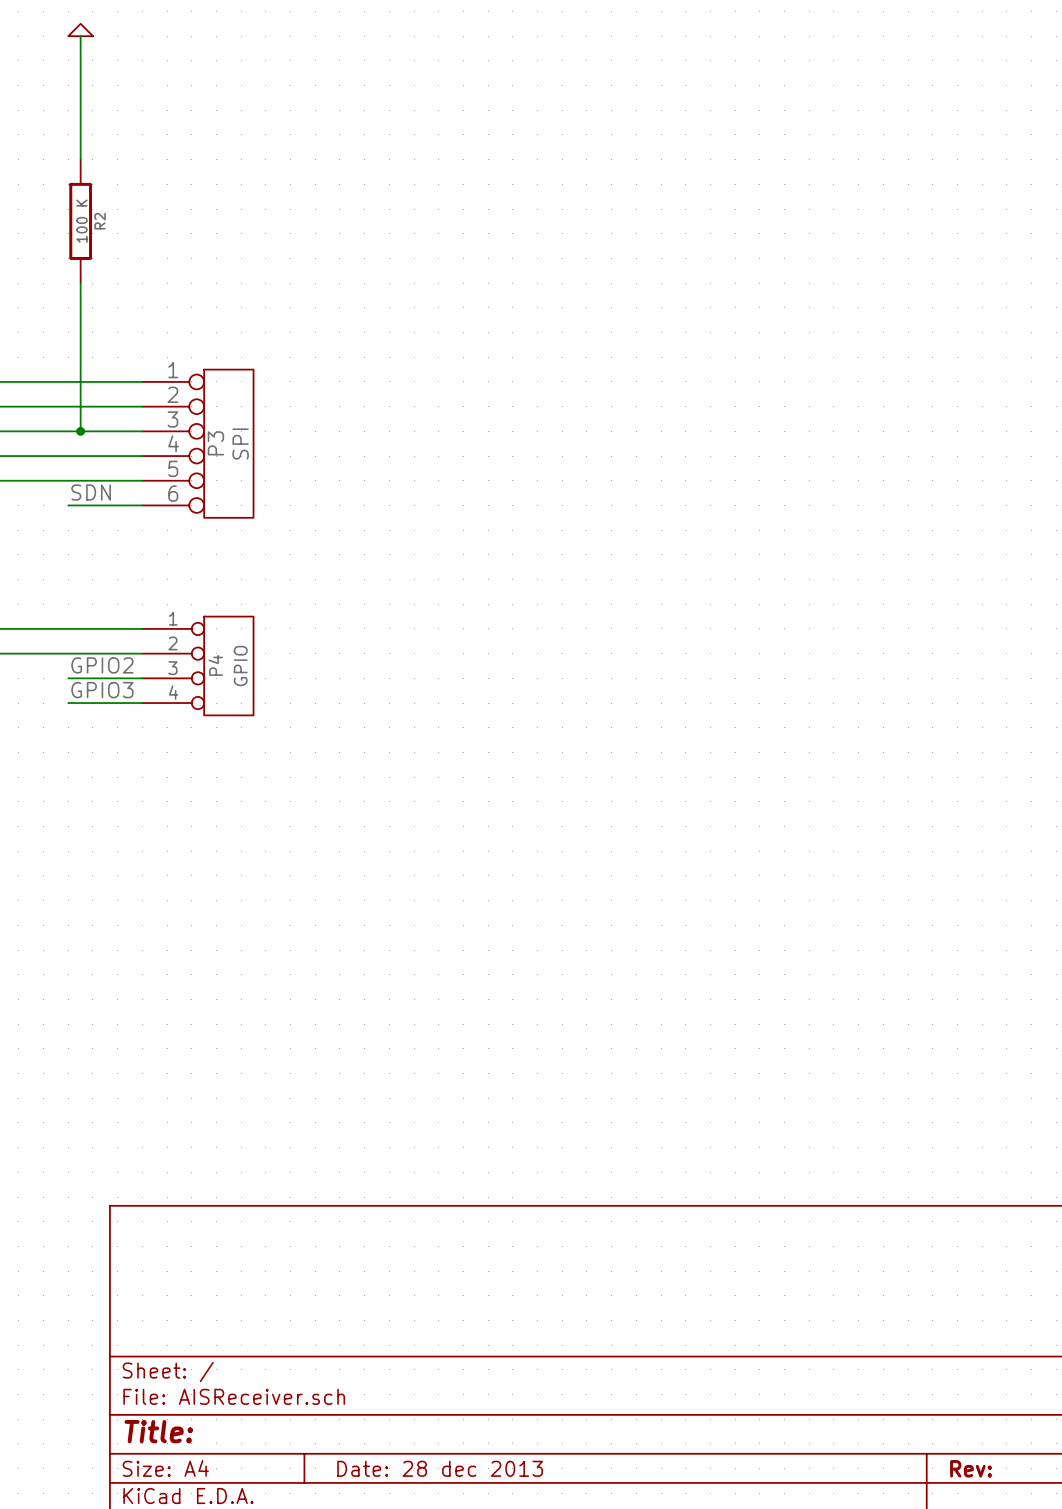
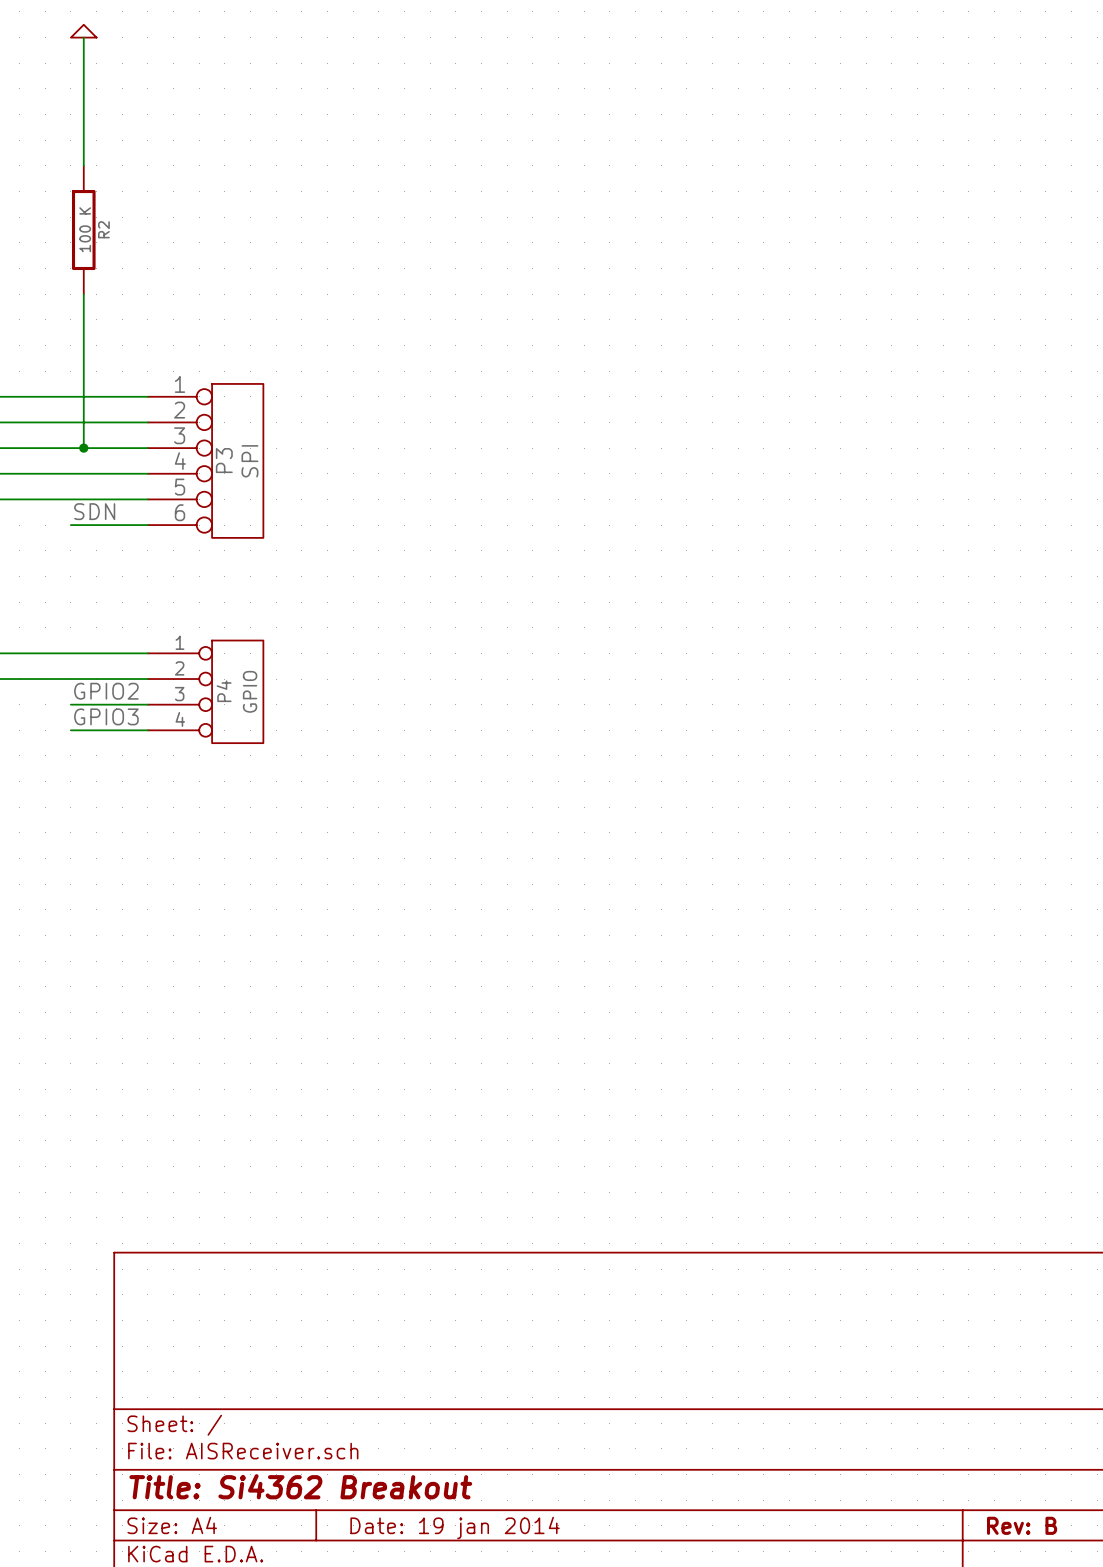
title block: Title: (158, 1431) -> Title: Si4362 Breakout (300, 1486)
title block: Date: 28 dec 2013 (440, 1468) -> Date: 19 jan 2014 (455, 1527)
title block: Rev: (971, 1468) -> Rev: B (1022, 1525)

